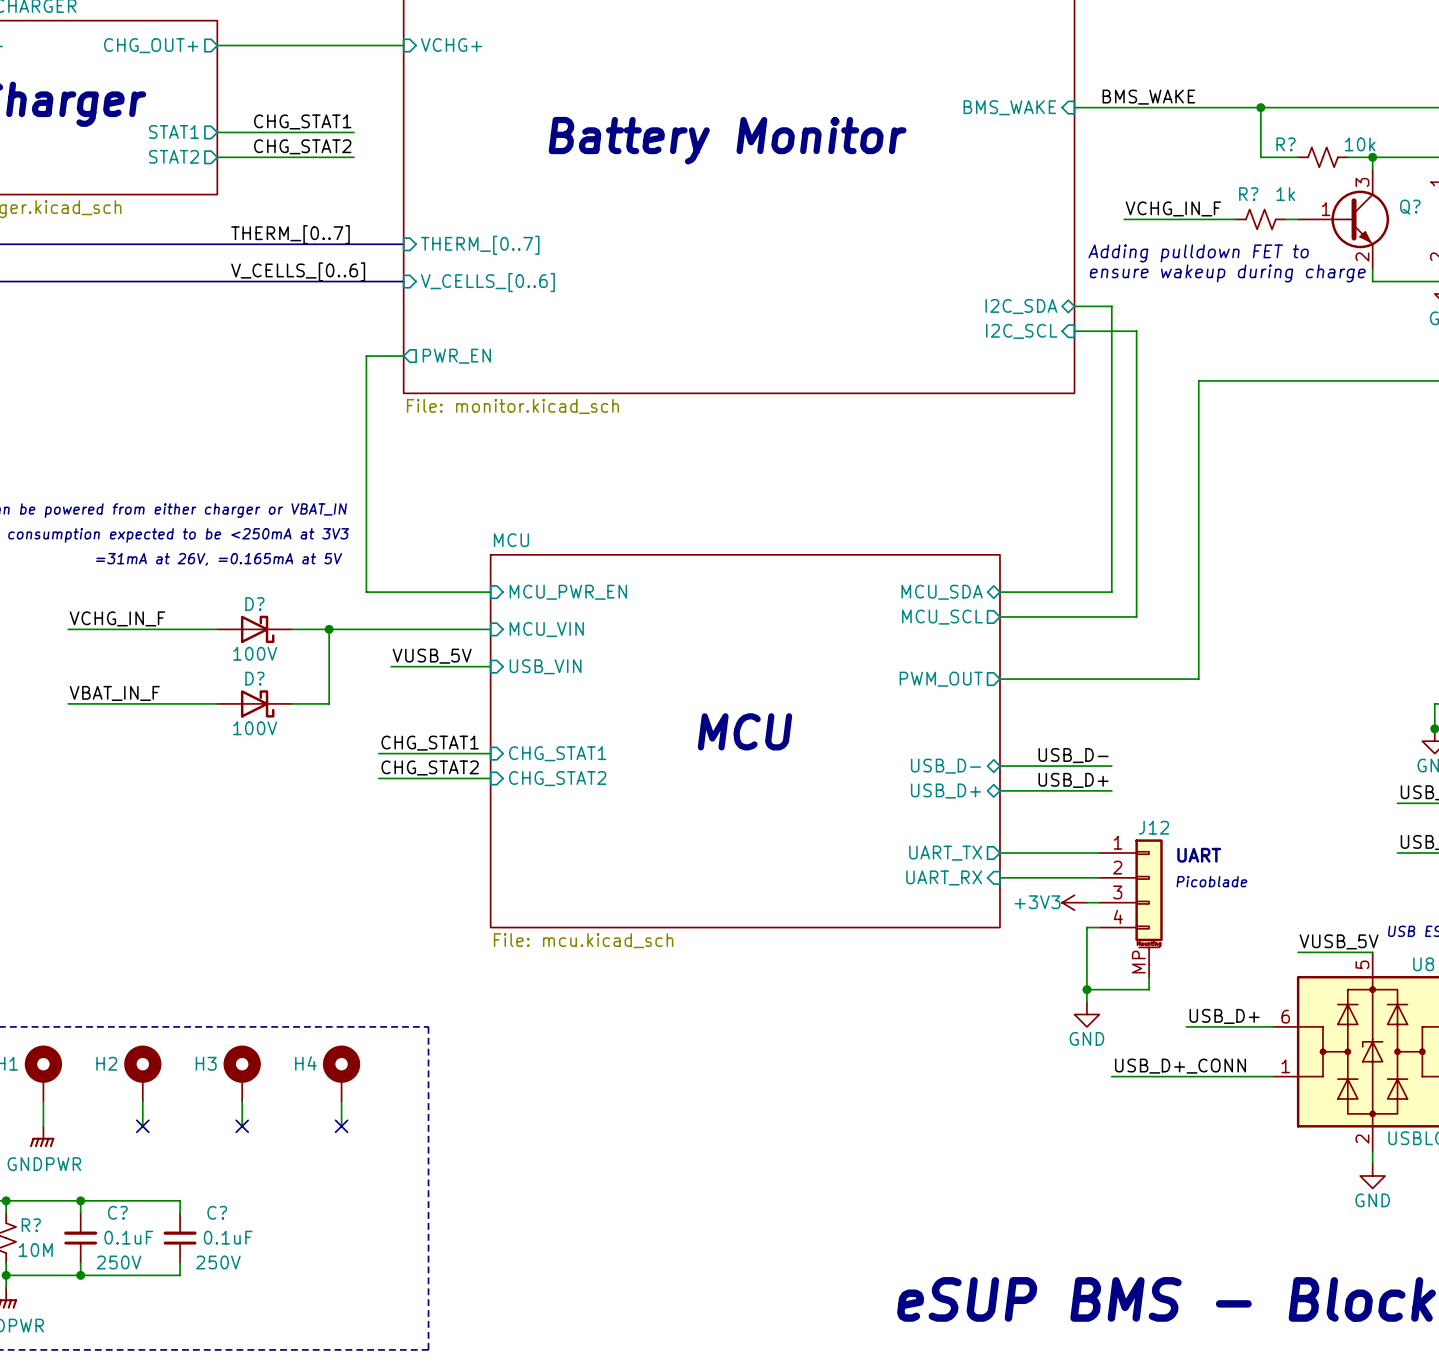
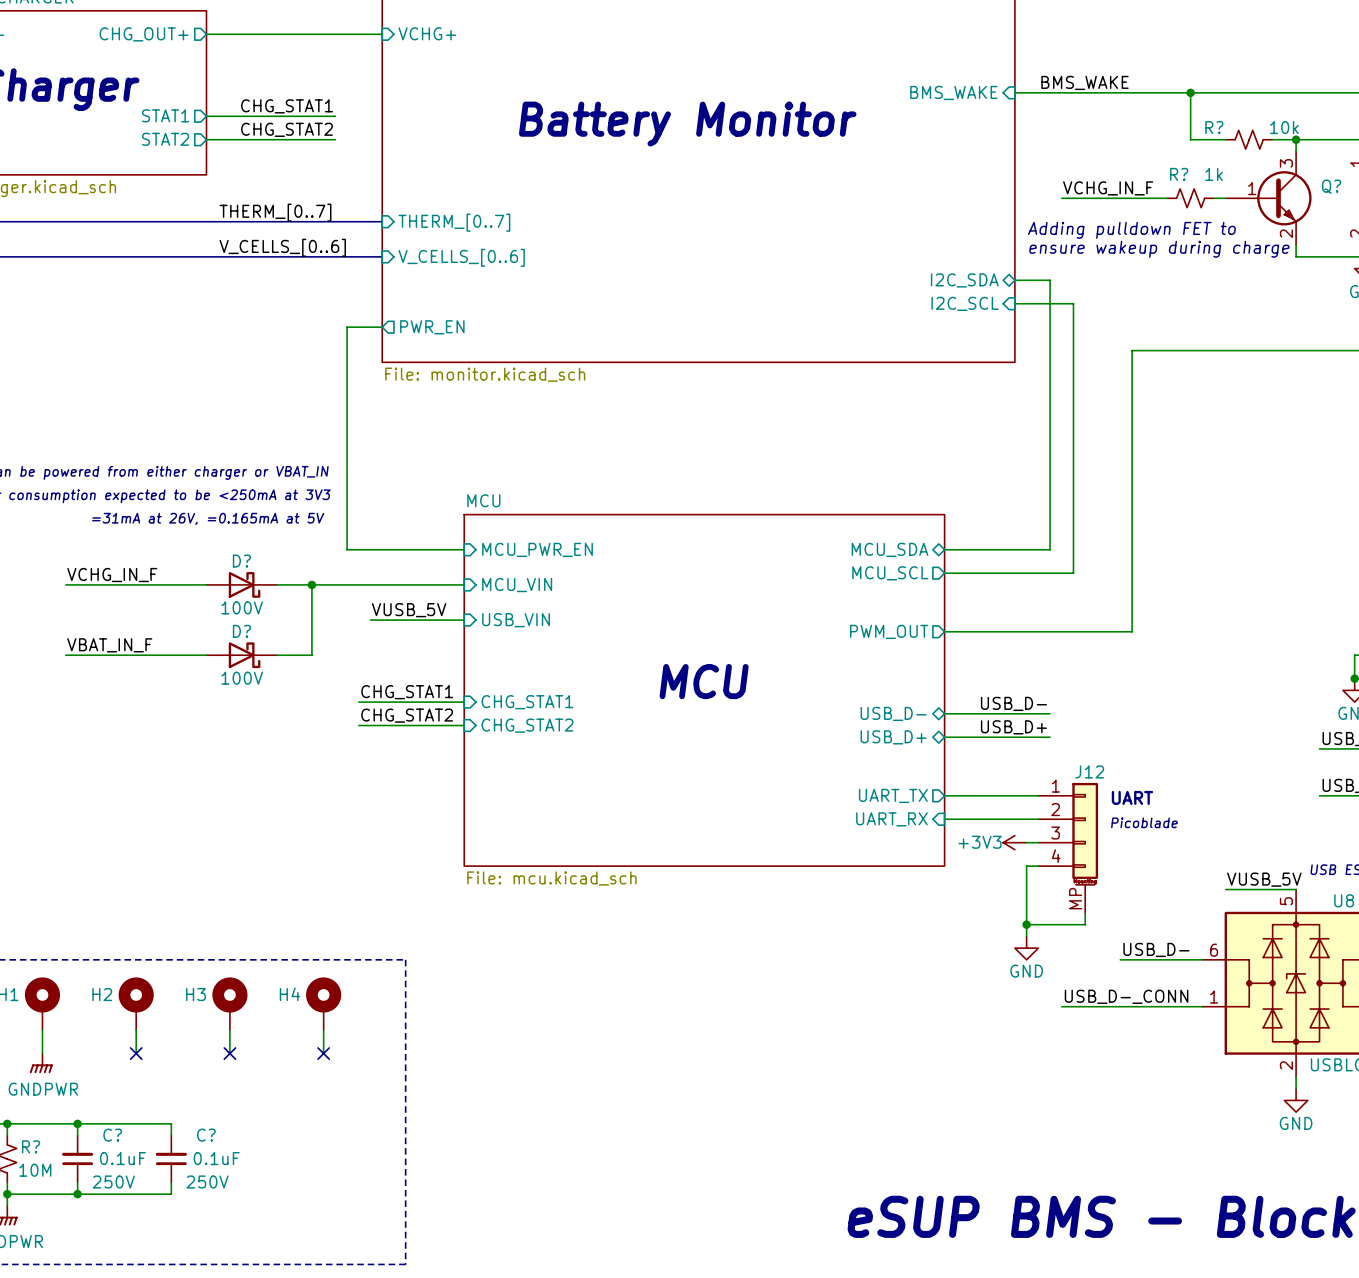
label: USB_D+ (1224, 1016) -> USB_D- (1156, 949)
label: USB_D+_CONN (1180, 1066) -> USB_D-_CONN (1126, 996)
wire: (1111, 1076) (1124, 1076) -> none

